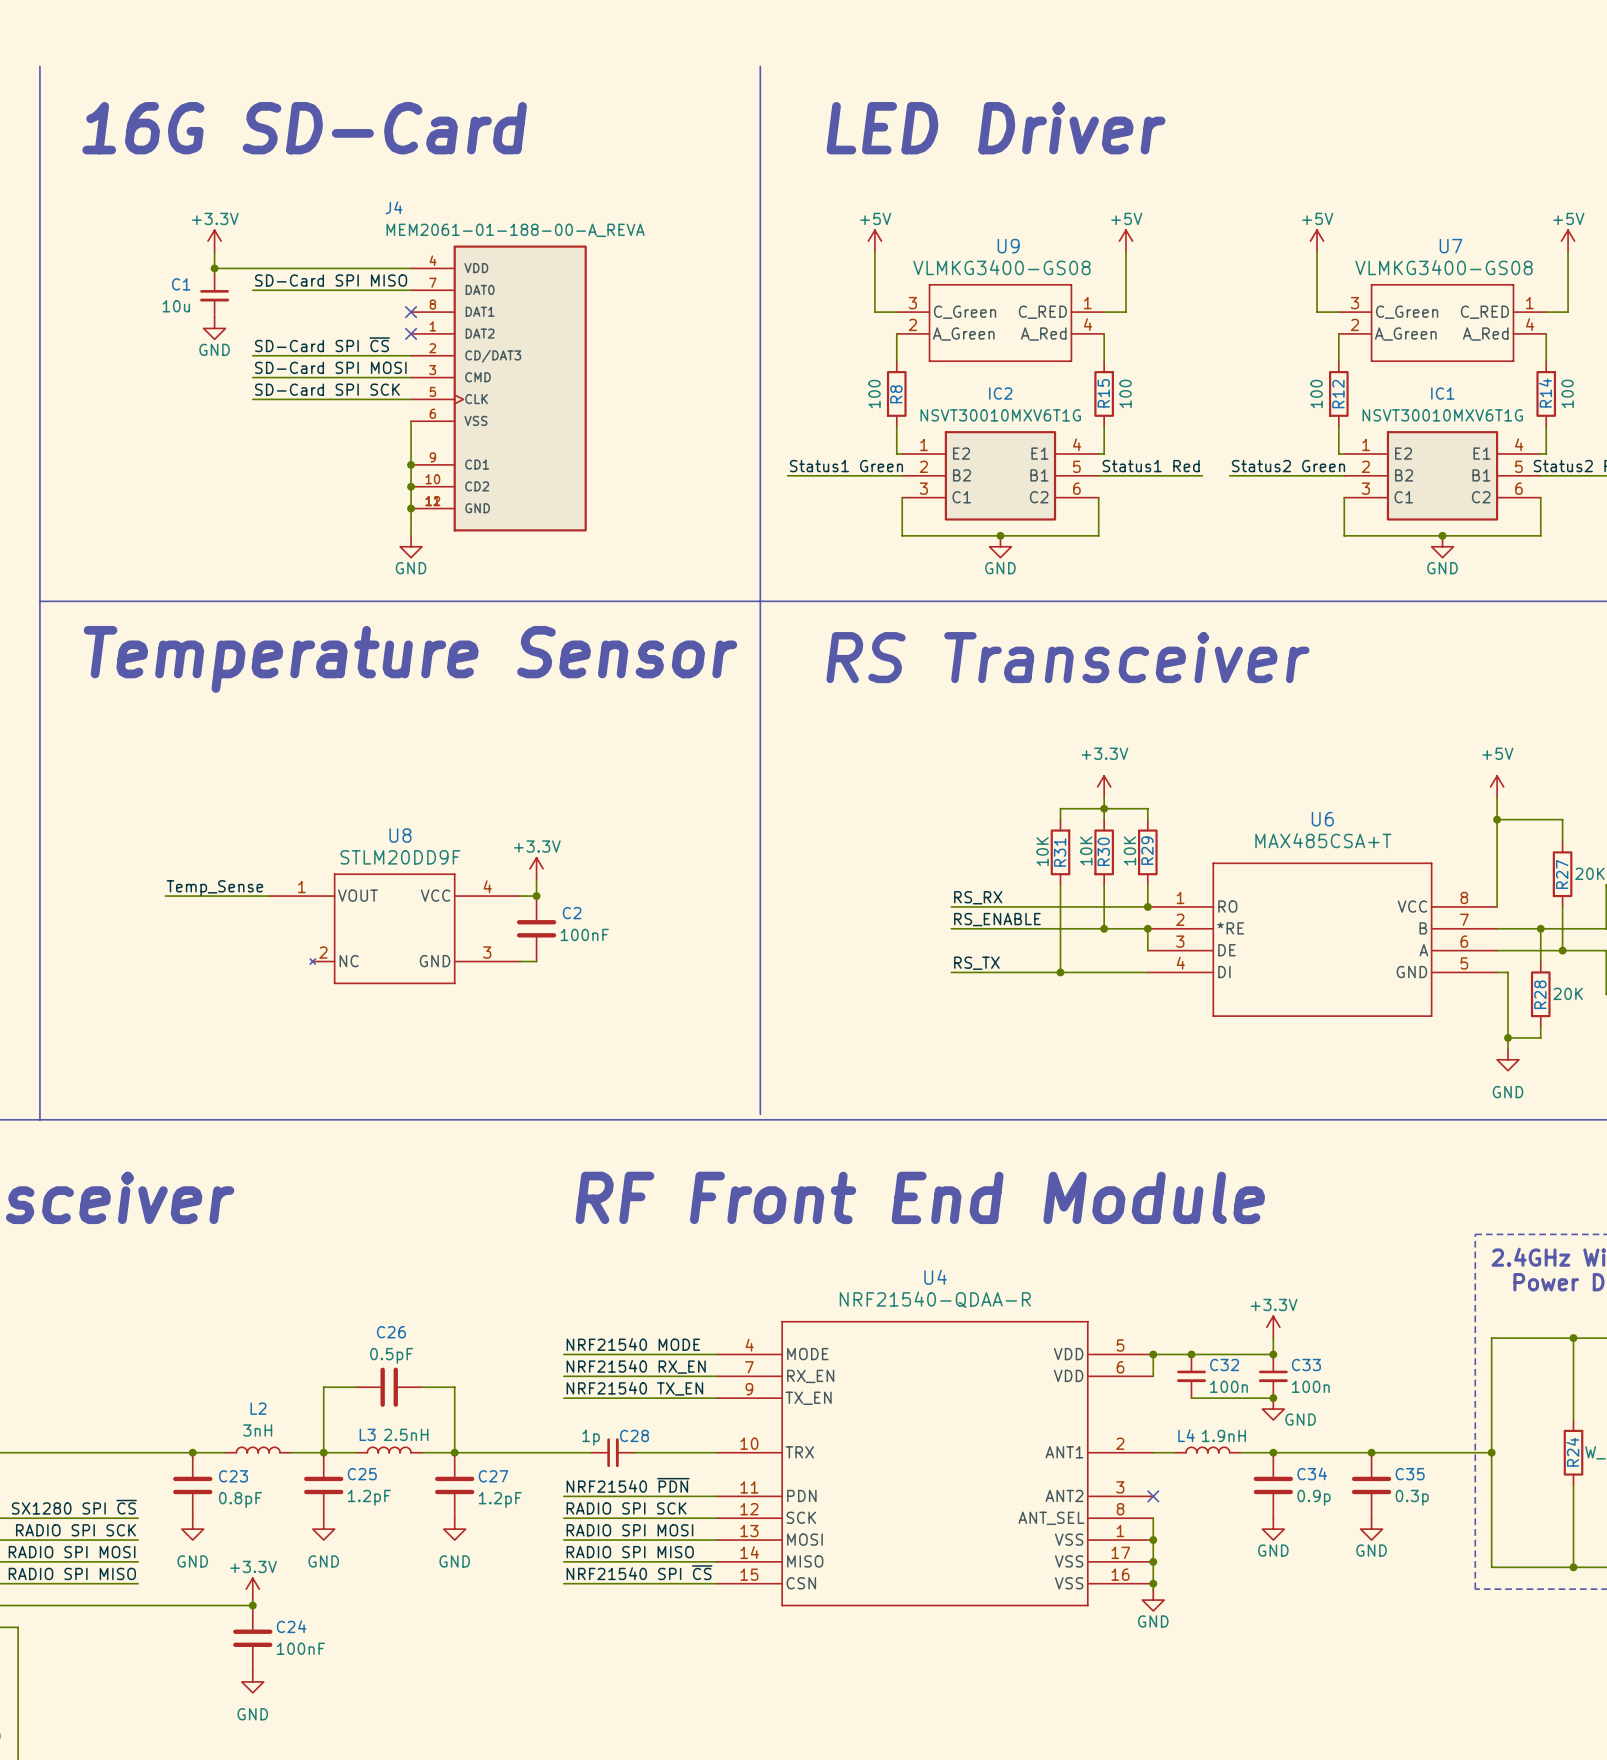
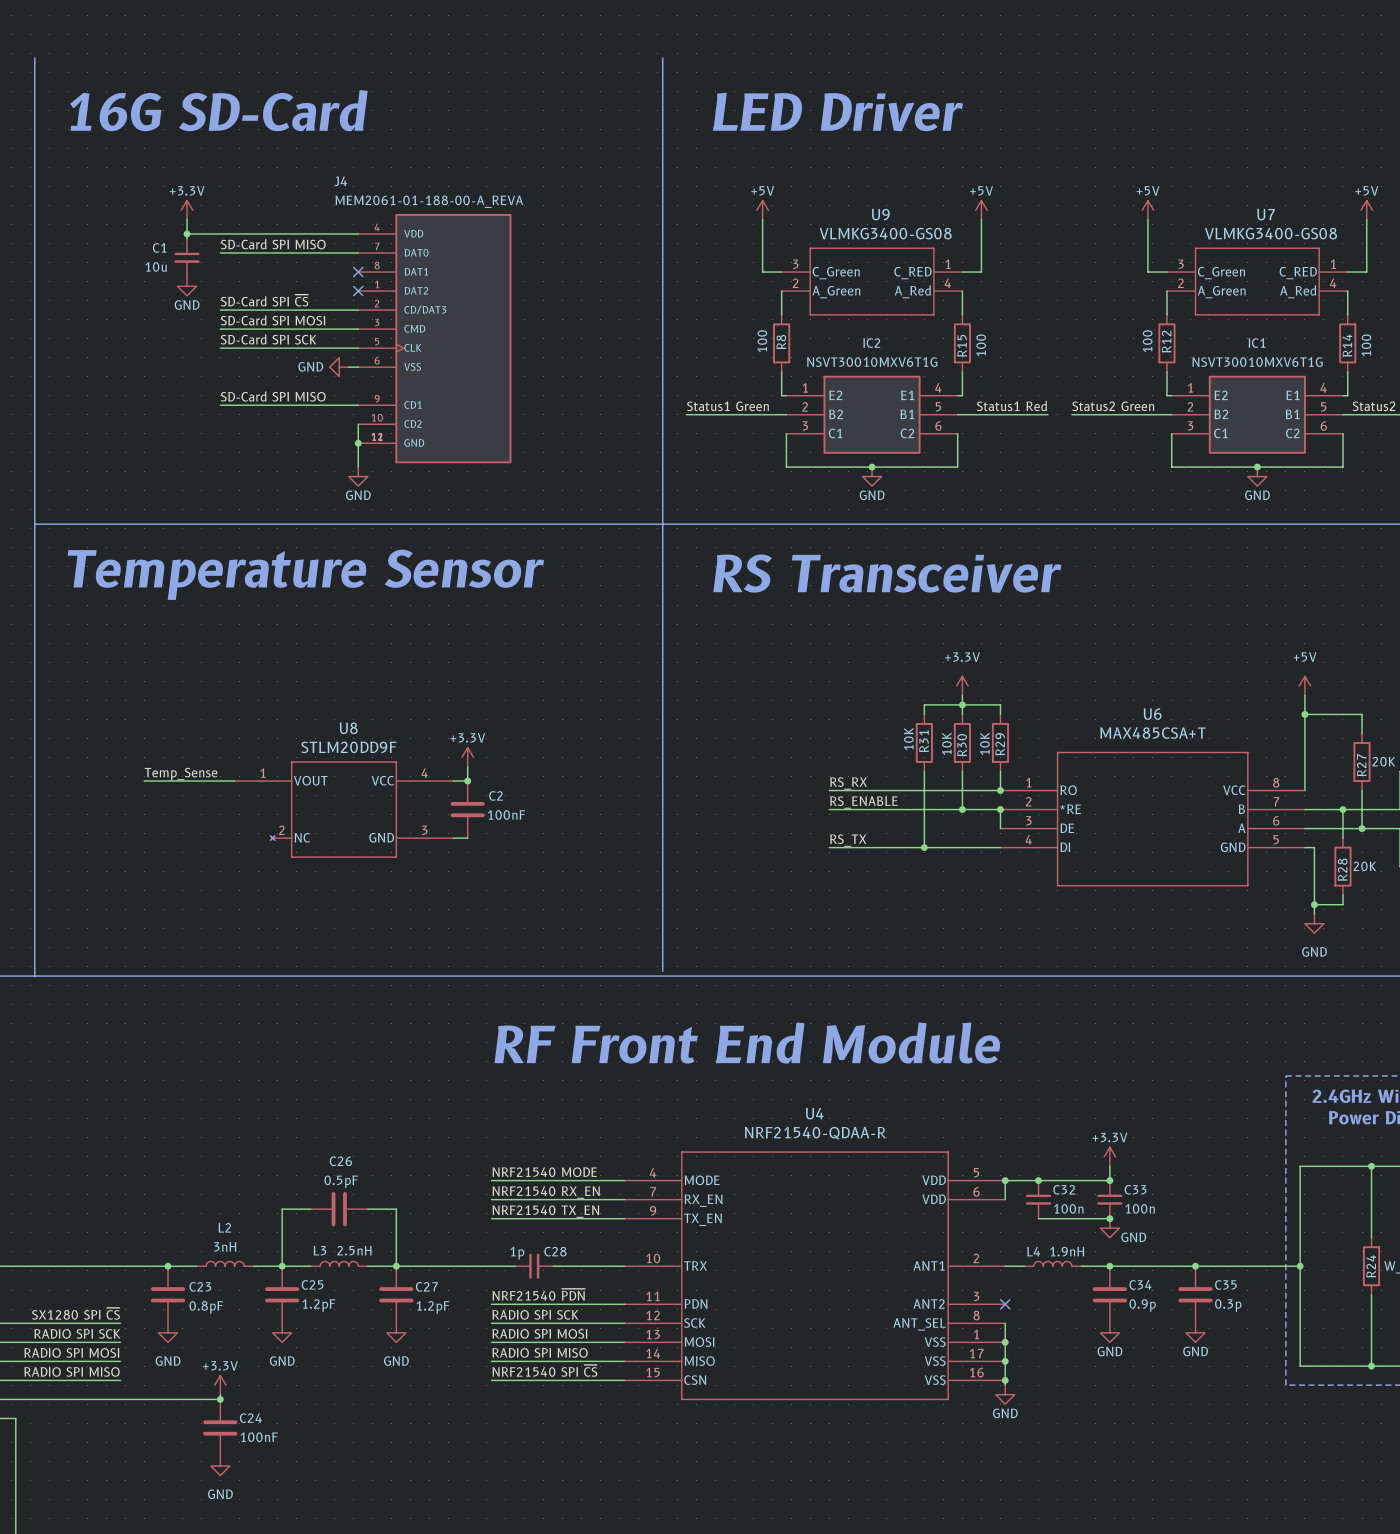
power symbol: none -> GND (339, 367)
wire: (411, 421) (411, 486) -> (358, 367) (348, 367)
label: none -> SD-Card SPI MISO (273, 396)
wire: none -> (220, 405) (358, 405)
junction: (411, 464) -> none
junction: (411, 486) -> none

